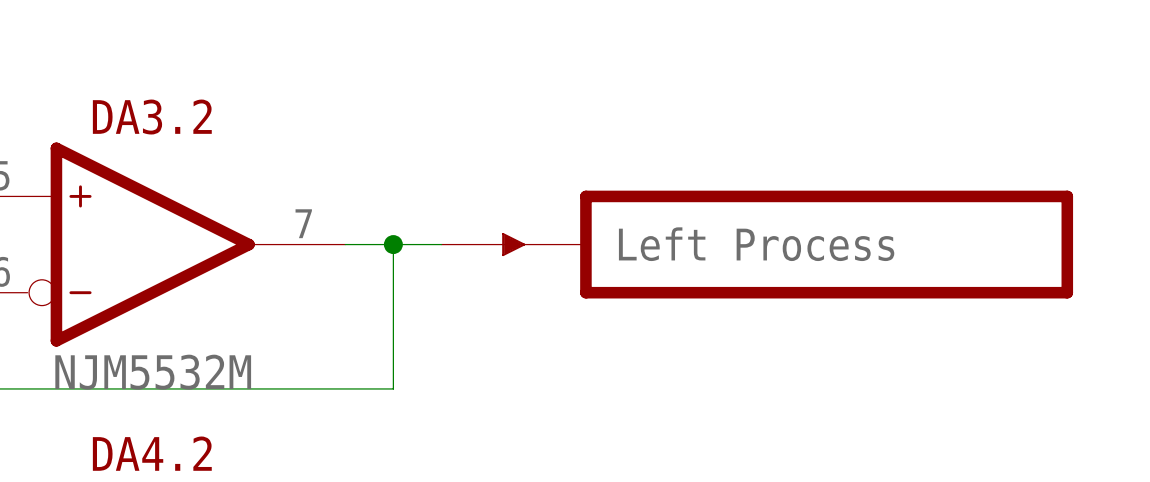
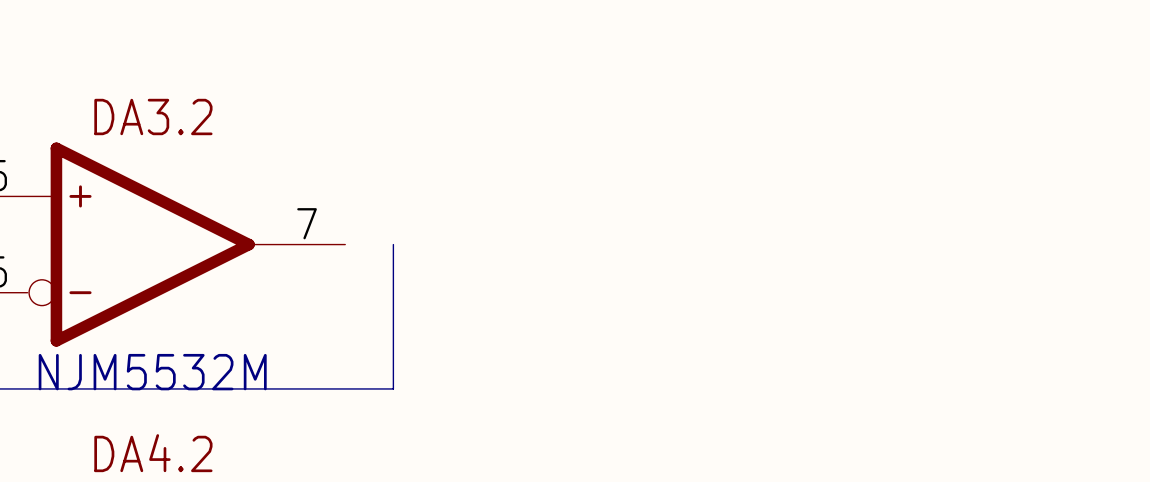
wire: (345, 244) (441, 244) -> none
junction: (393, 244) -> none
part: (757, 244) -> none

